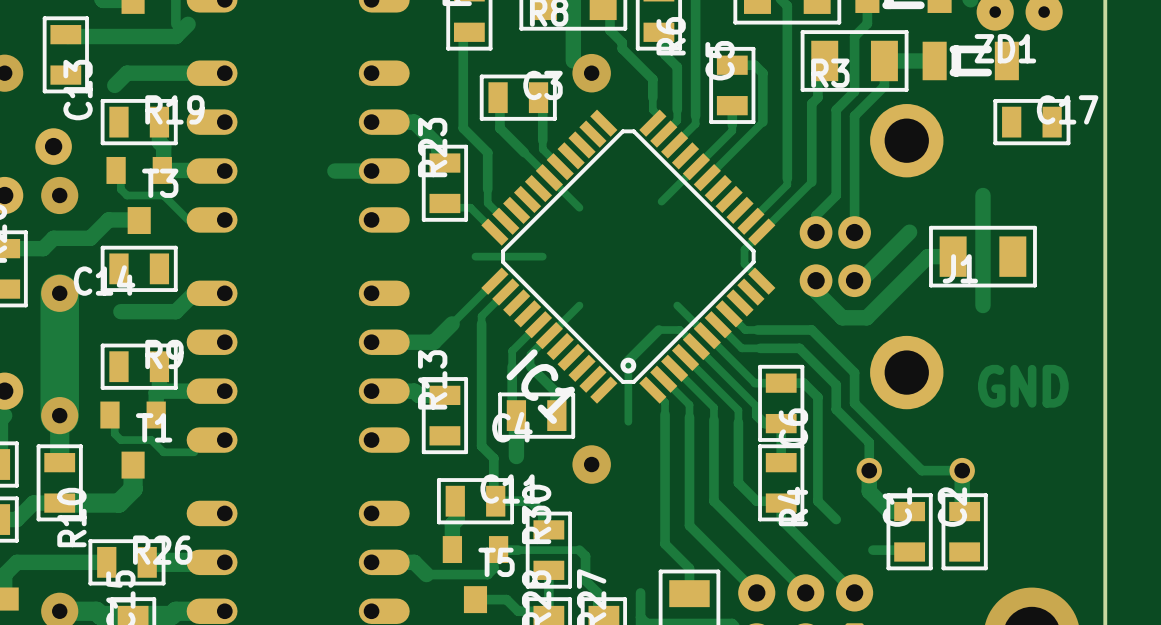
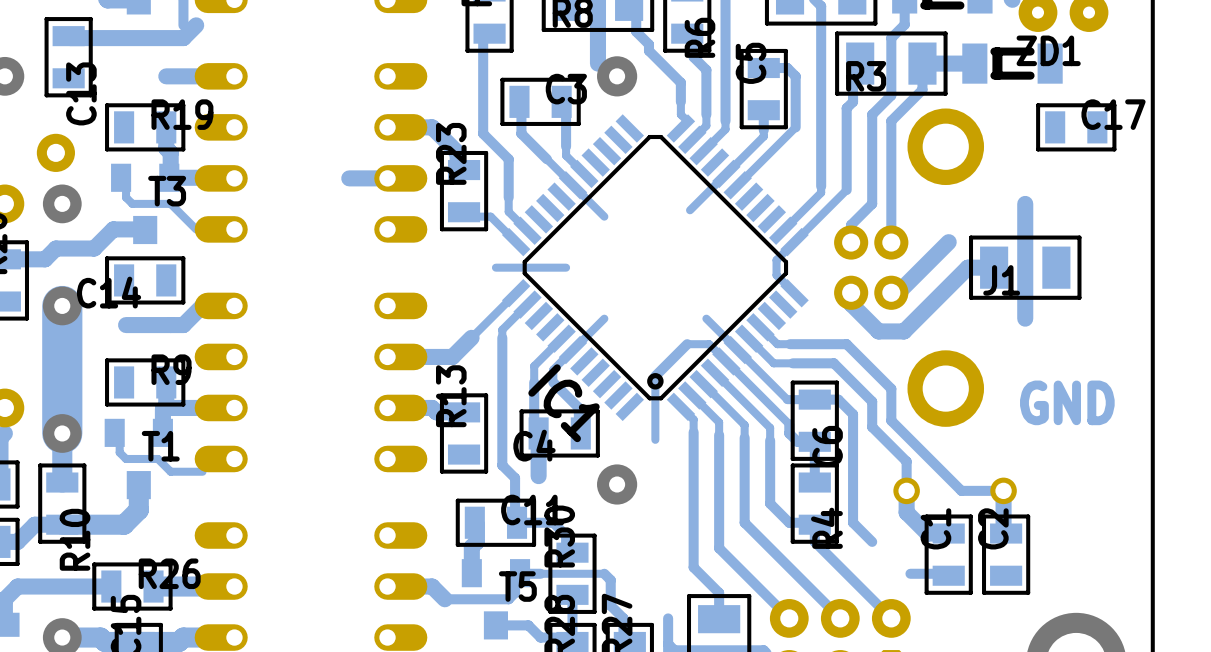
track: (159, 73) (126, 73) (114, 85) -> none

